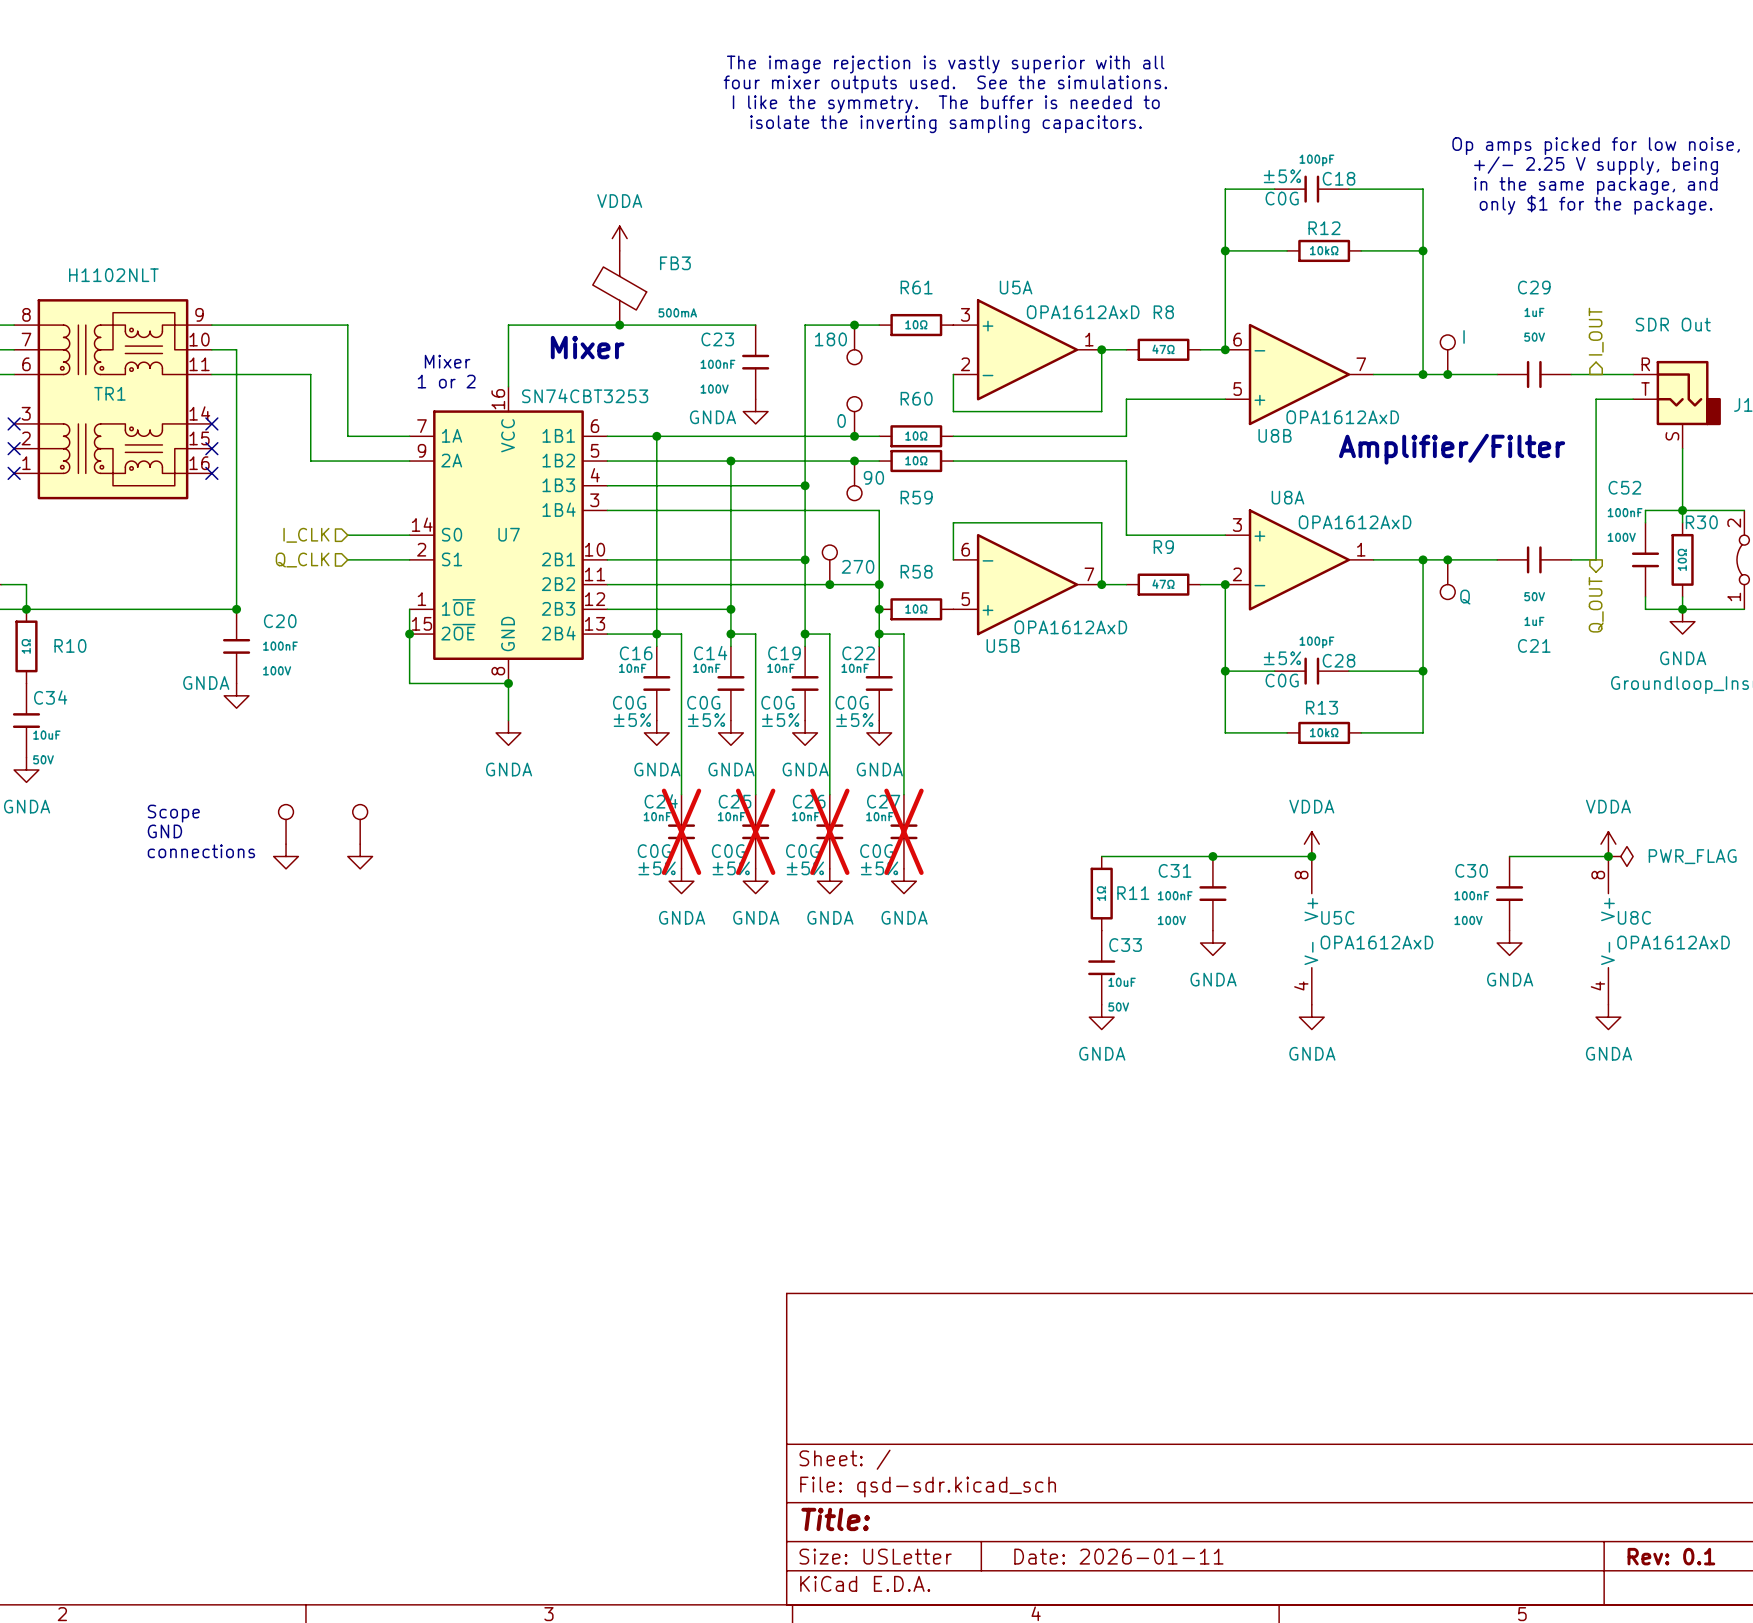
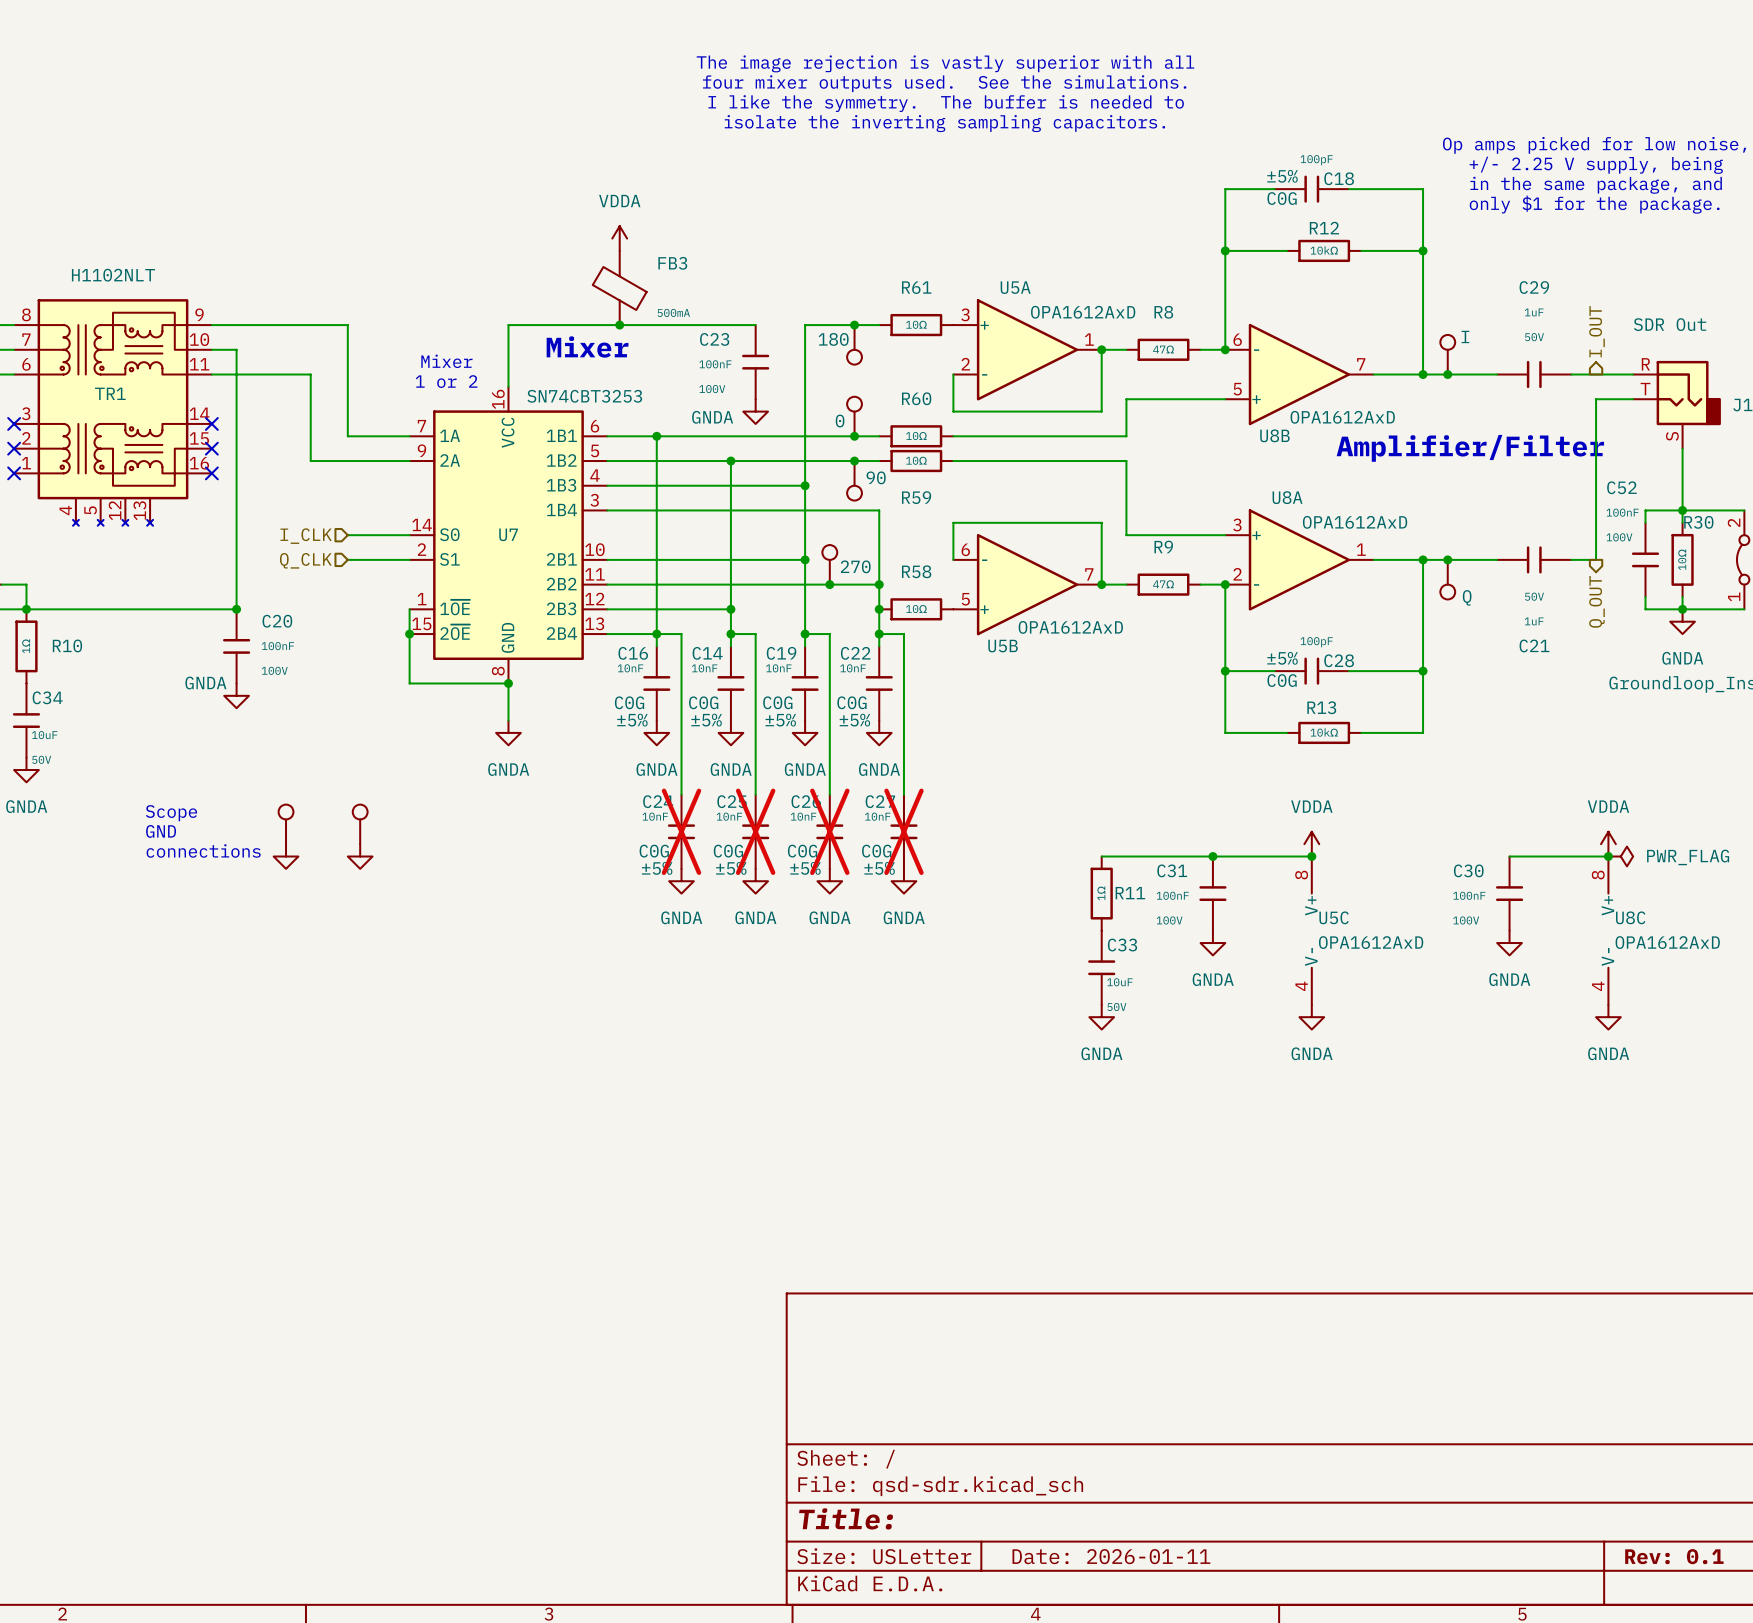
TR1 symbol: [14, 299, 212, 500] -> [14, 299, 212, 526]

